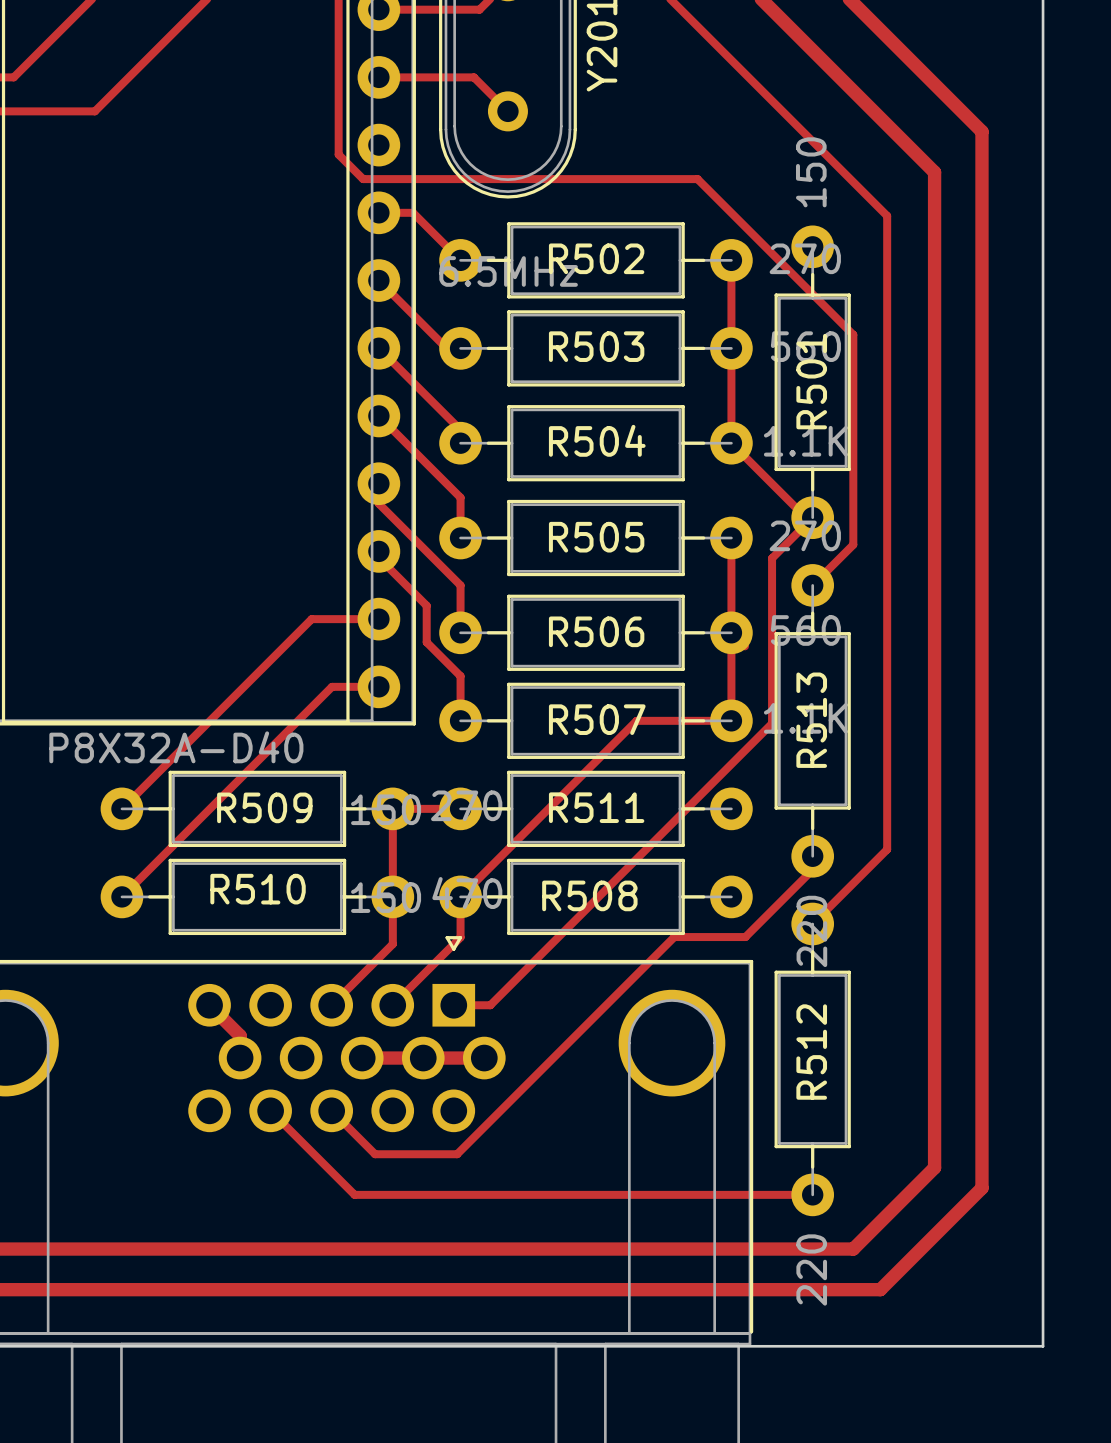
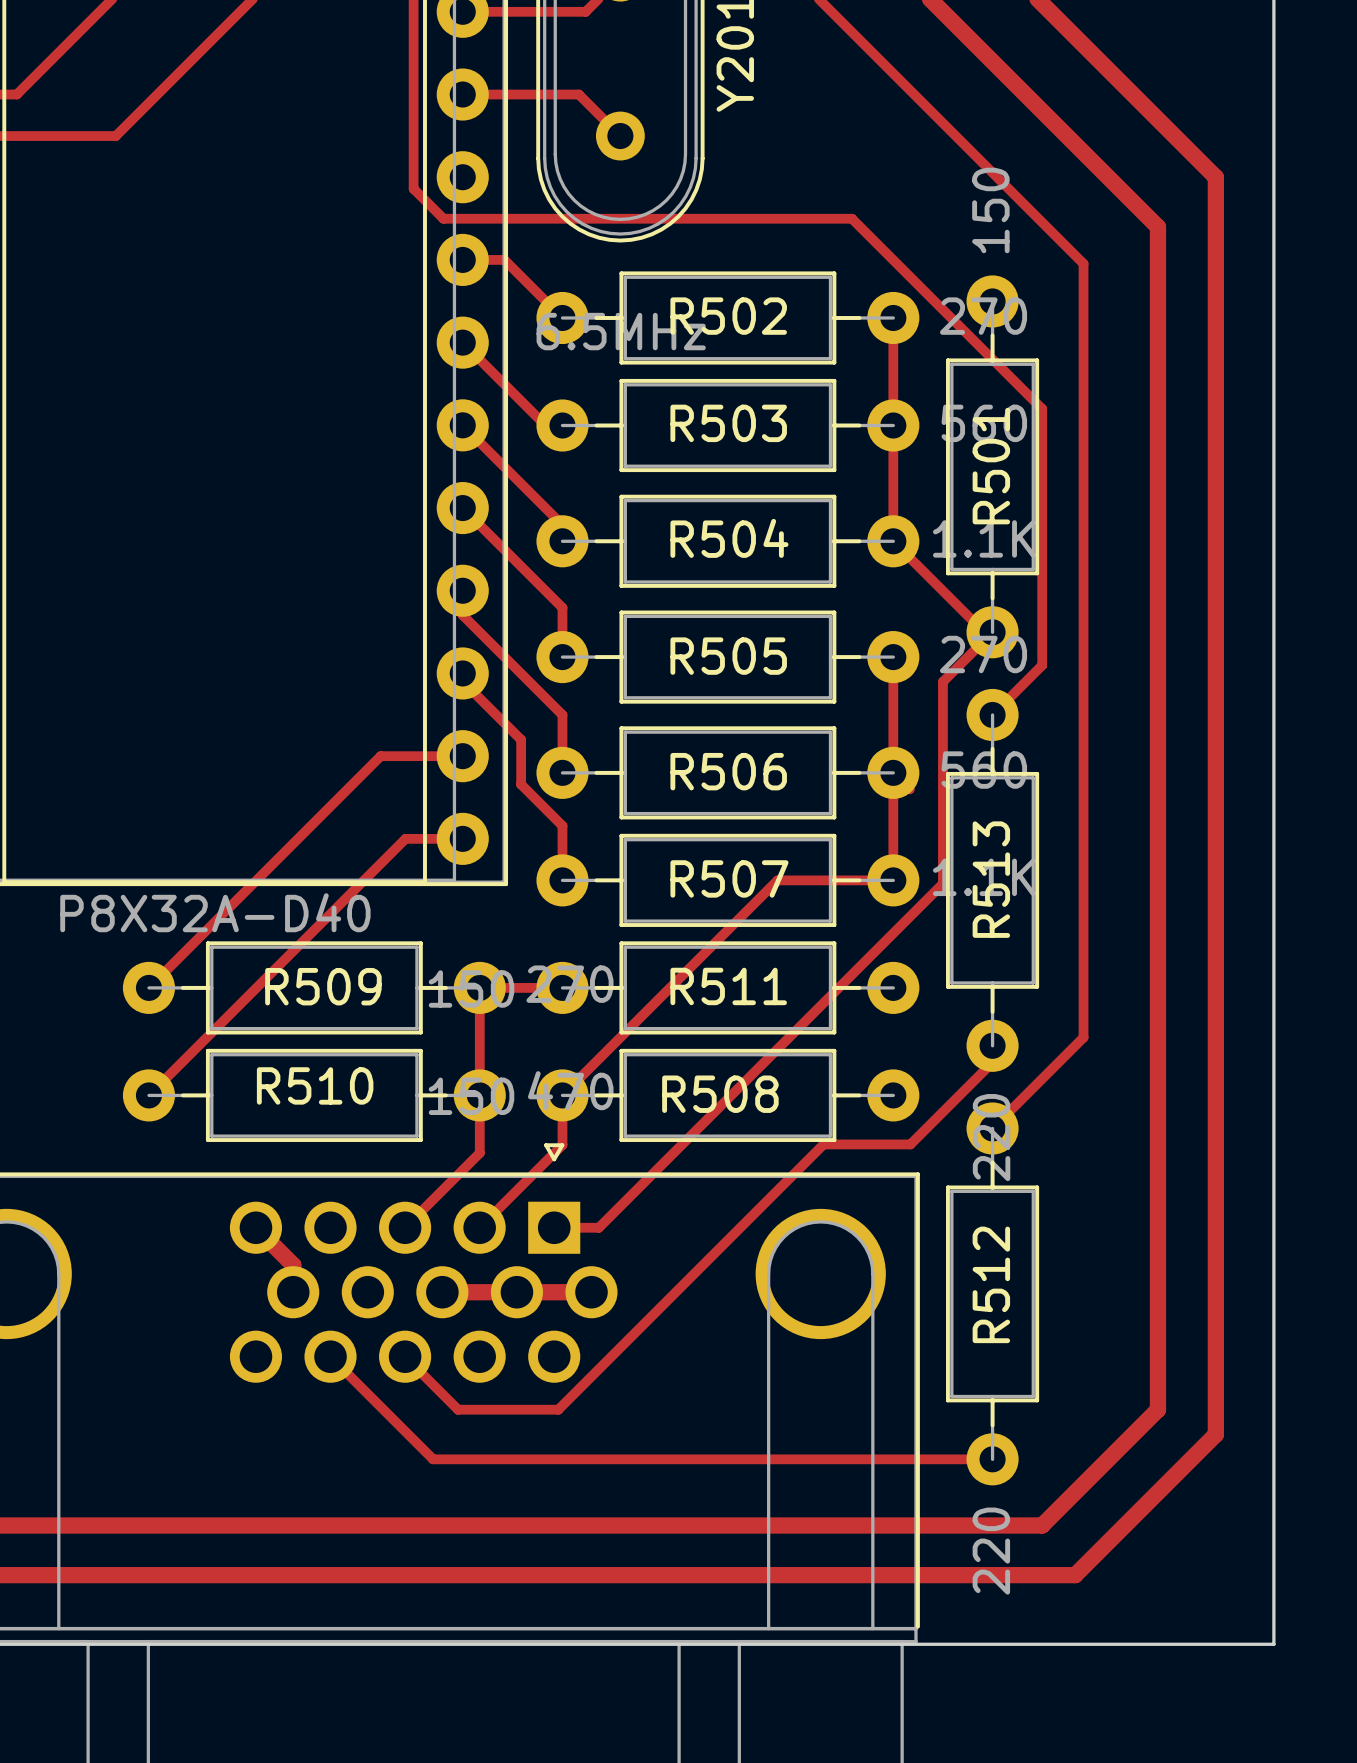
track: (981, 131) (981, 1188) -> (1199, 160) (1215, 177) (1215, 1434) (1199, 1451)
track: (934, 172) (934, 1167) -> (1141, 210) (1157, 227) (1157, 1409) (1141, 1426)

